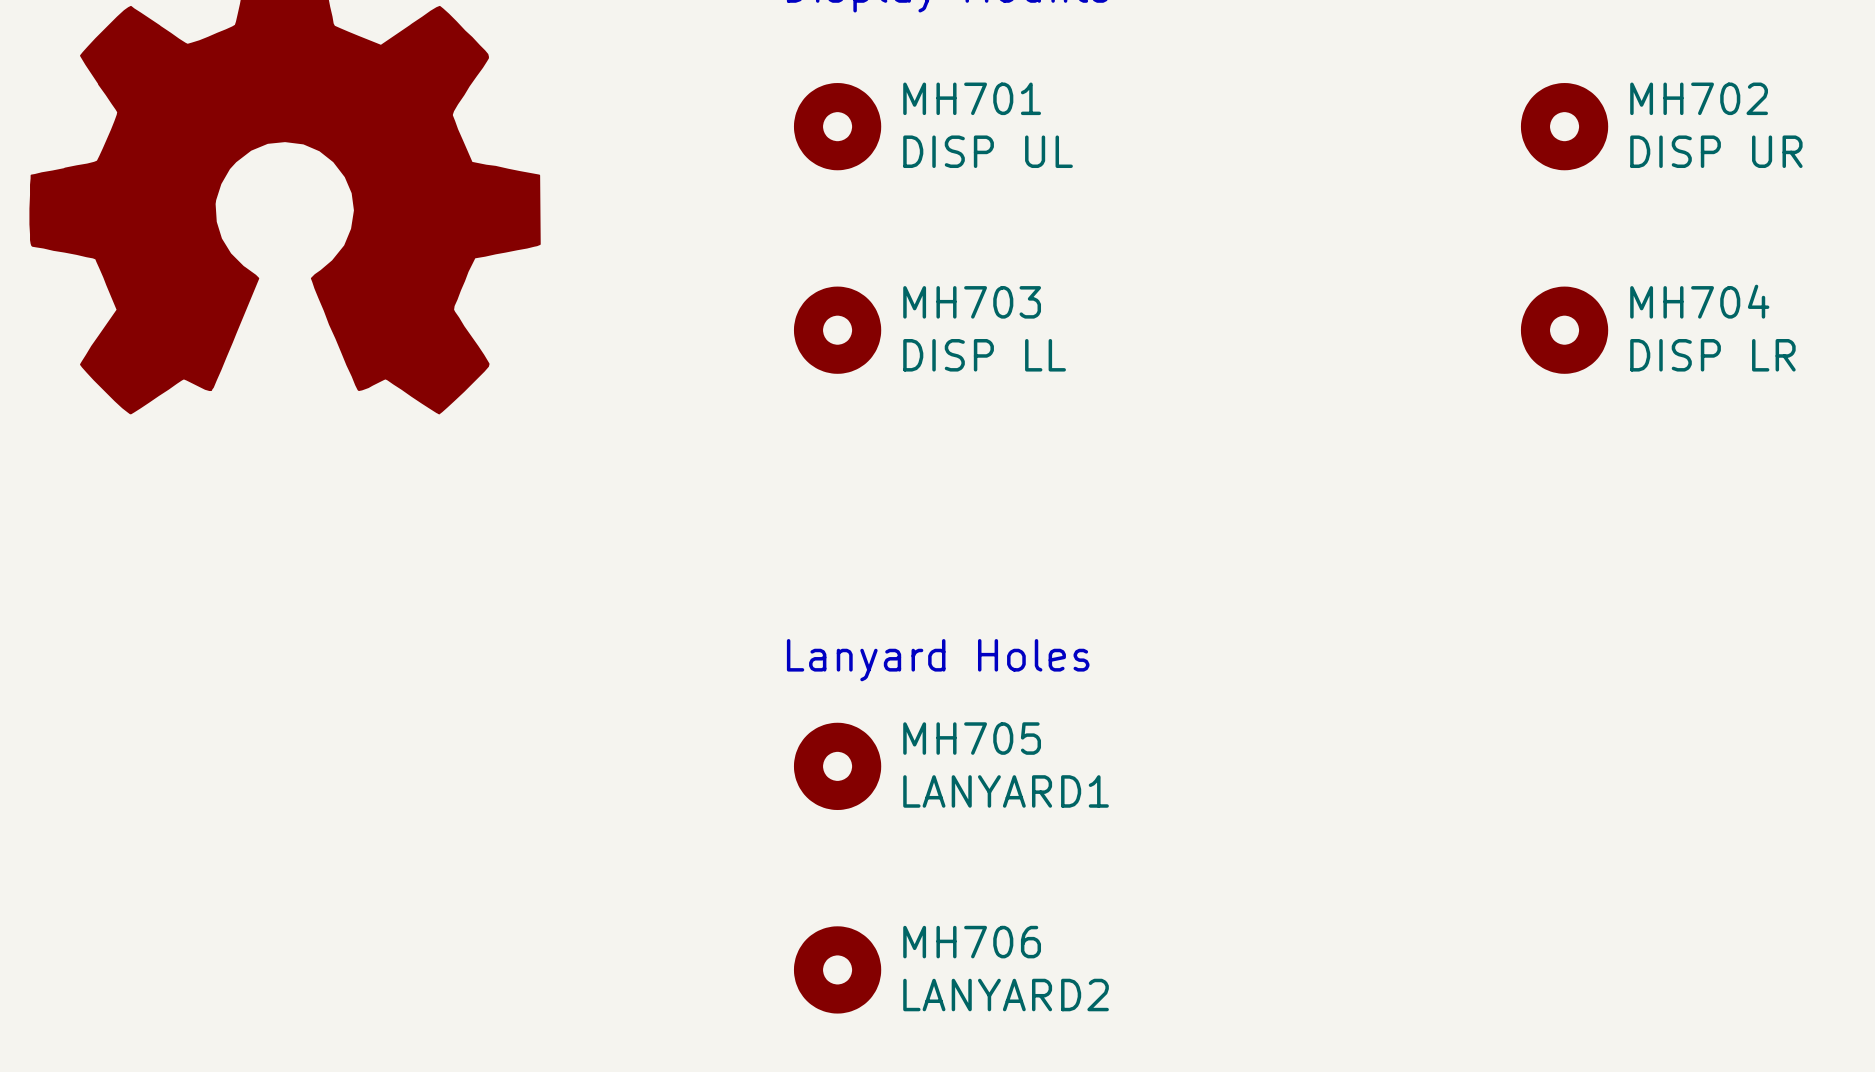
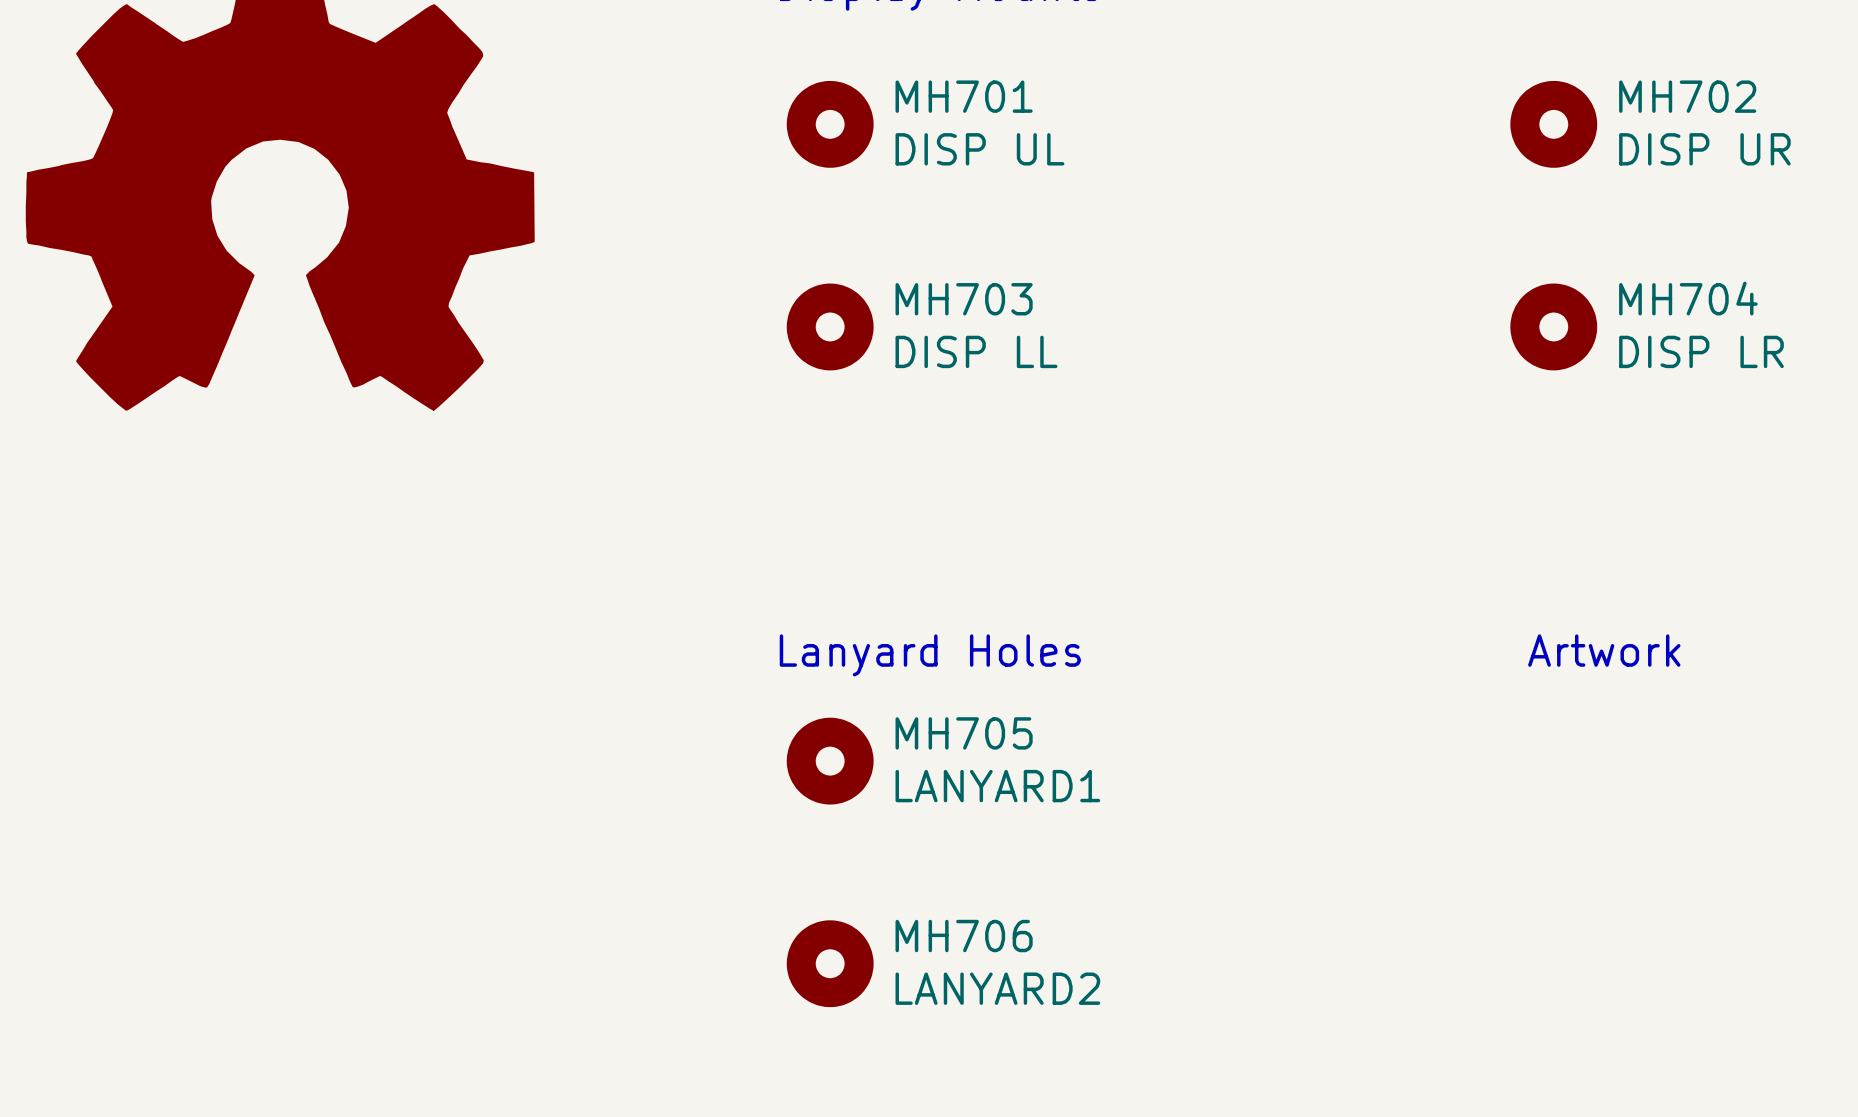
text: none -> Artwork (1604, 650)

